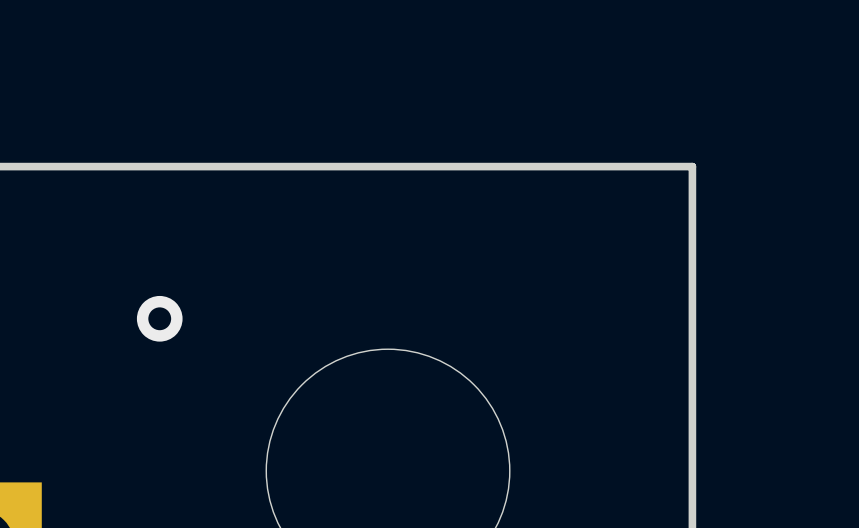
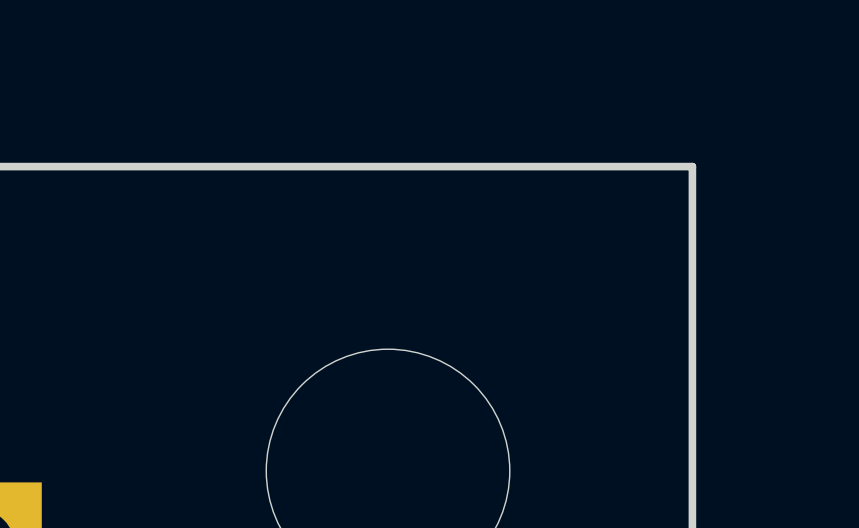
via: (159, 318) -> none

